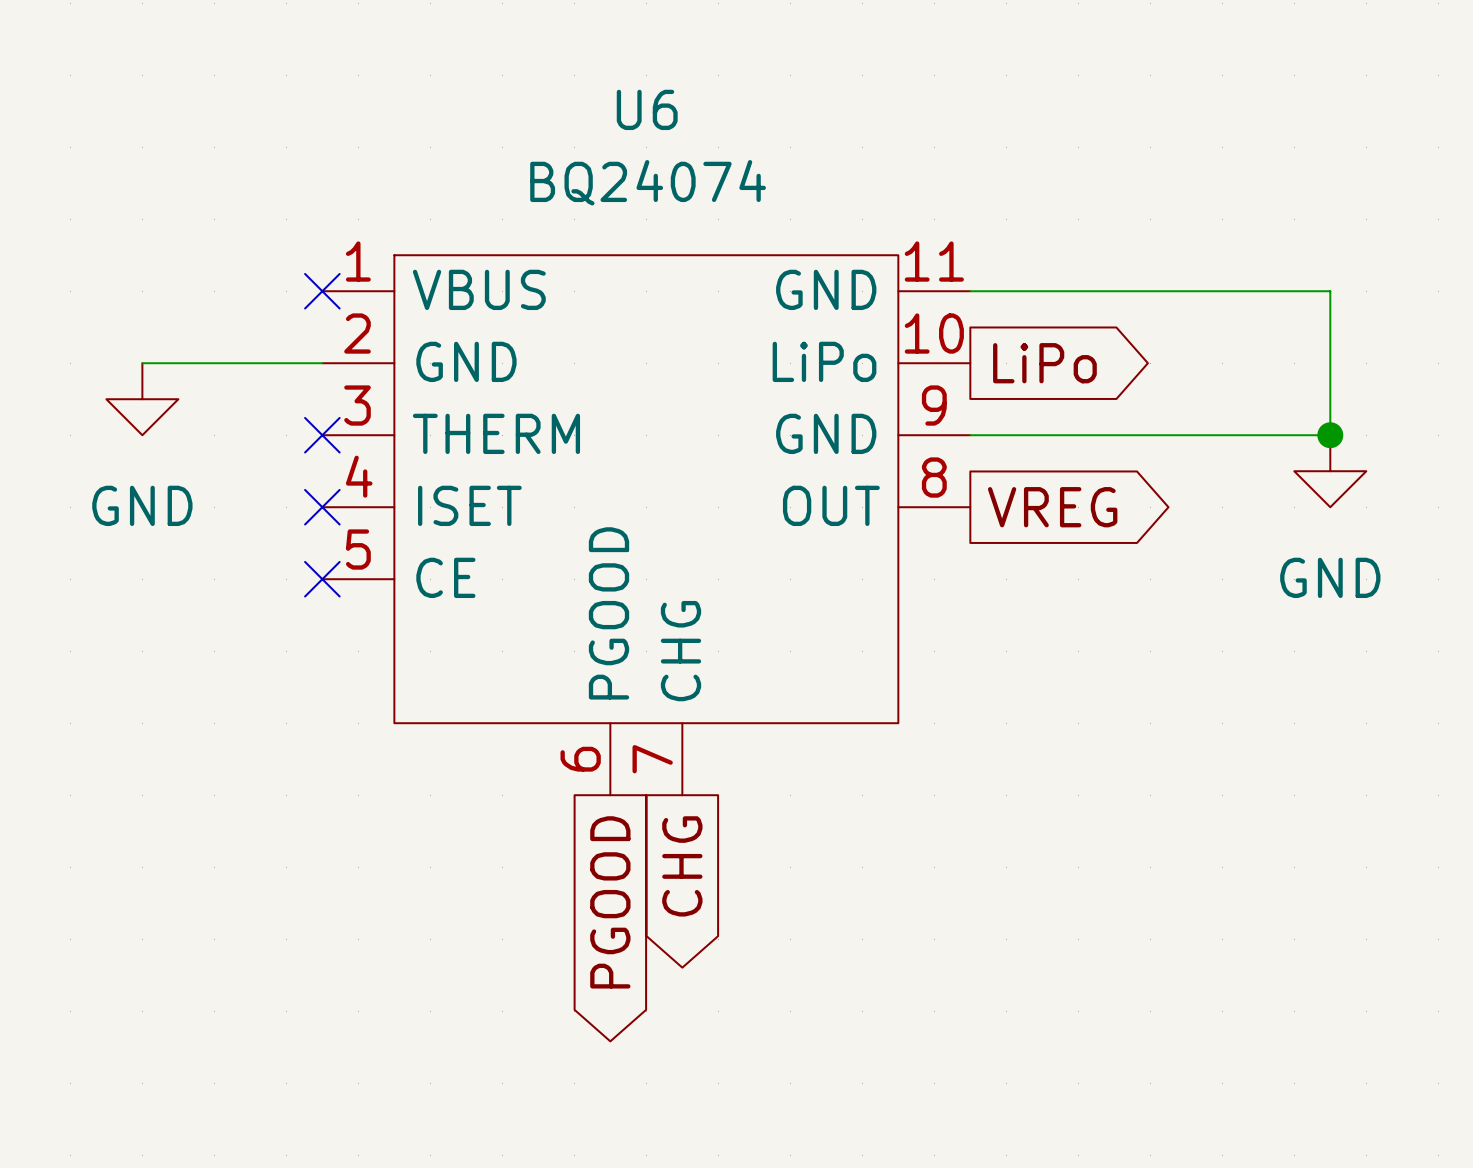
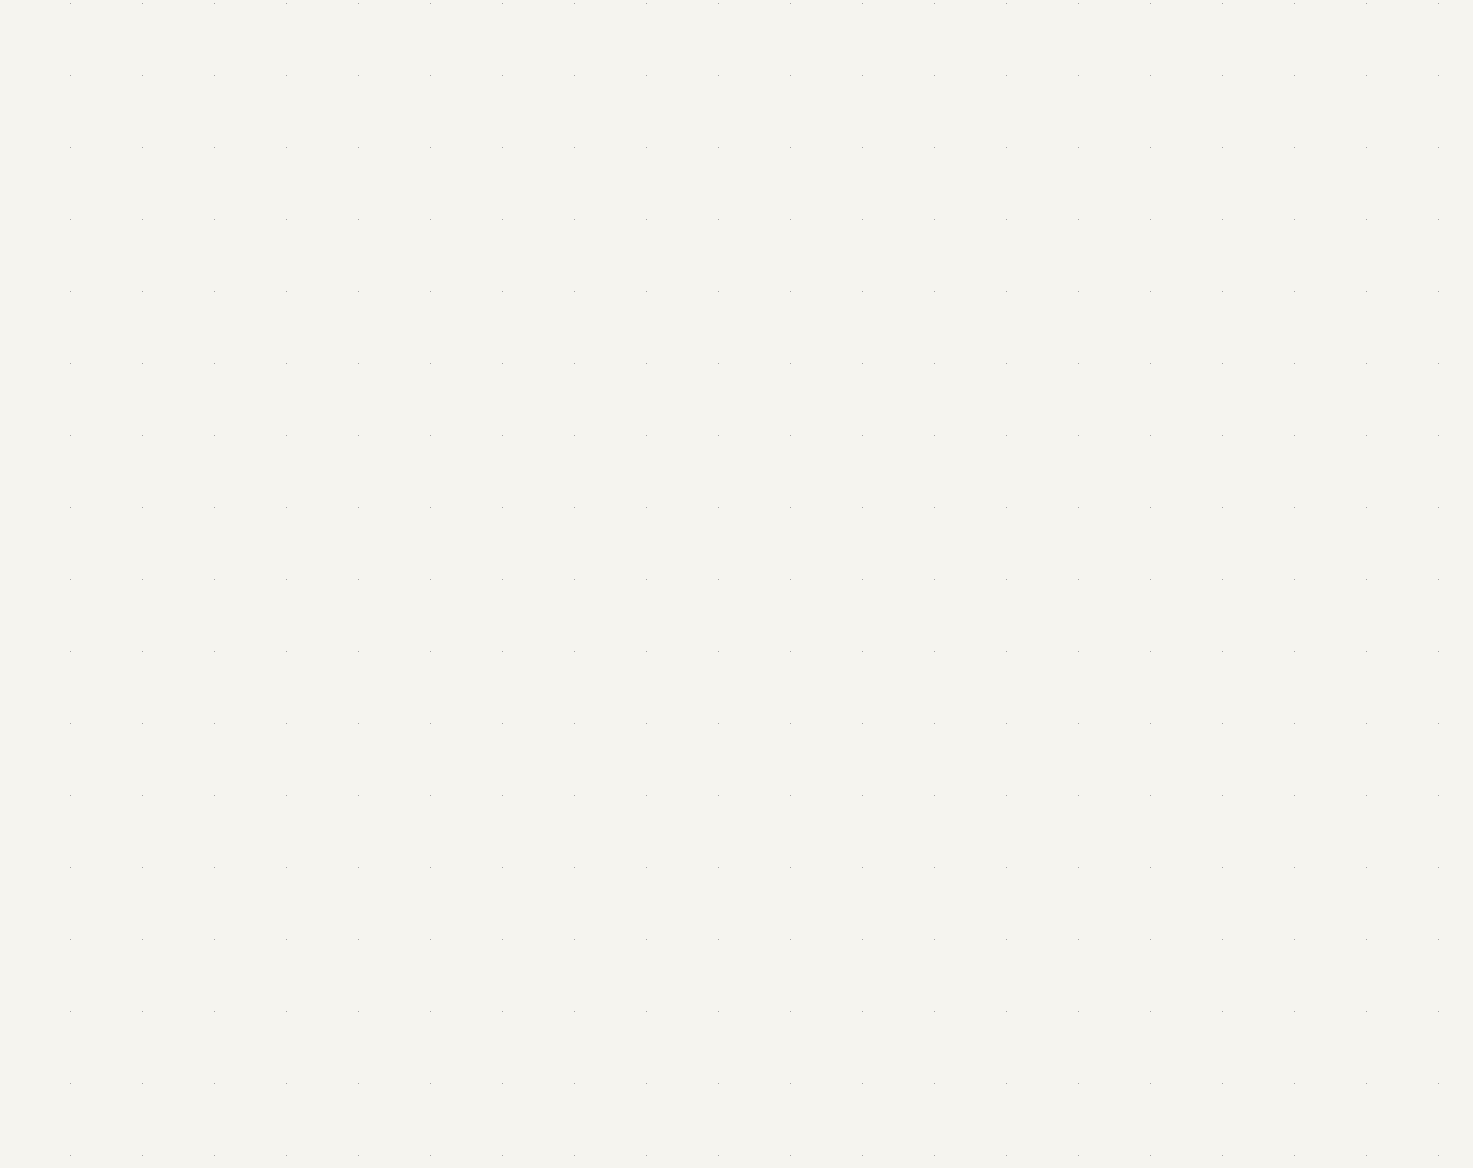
no-connect mark: (322, 291) -> none
wire: (970, 291) (1330, 291) (1330, 435) (970, 435) -> none
wire: (142, 363) (322, 363) -> none
global label: LiPo (1044, 363) -> none
power symbol: GND (142, 399) -> none
no-connect mark: (322, 435) -> none
junction: (1330, 435) -> none
power symbol: GND (1330, 471) -> none
no-connect mark: (322, 507) -> none
global label: VREG (1052, 507) -> none
U6: BQ24074 (646, 525) -> none
no-connect mark: (322, 579) -> none
global label: CHG (682, 866) -> none
global label: PGOOD (610, 902) -> none

